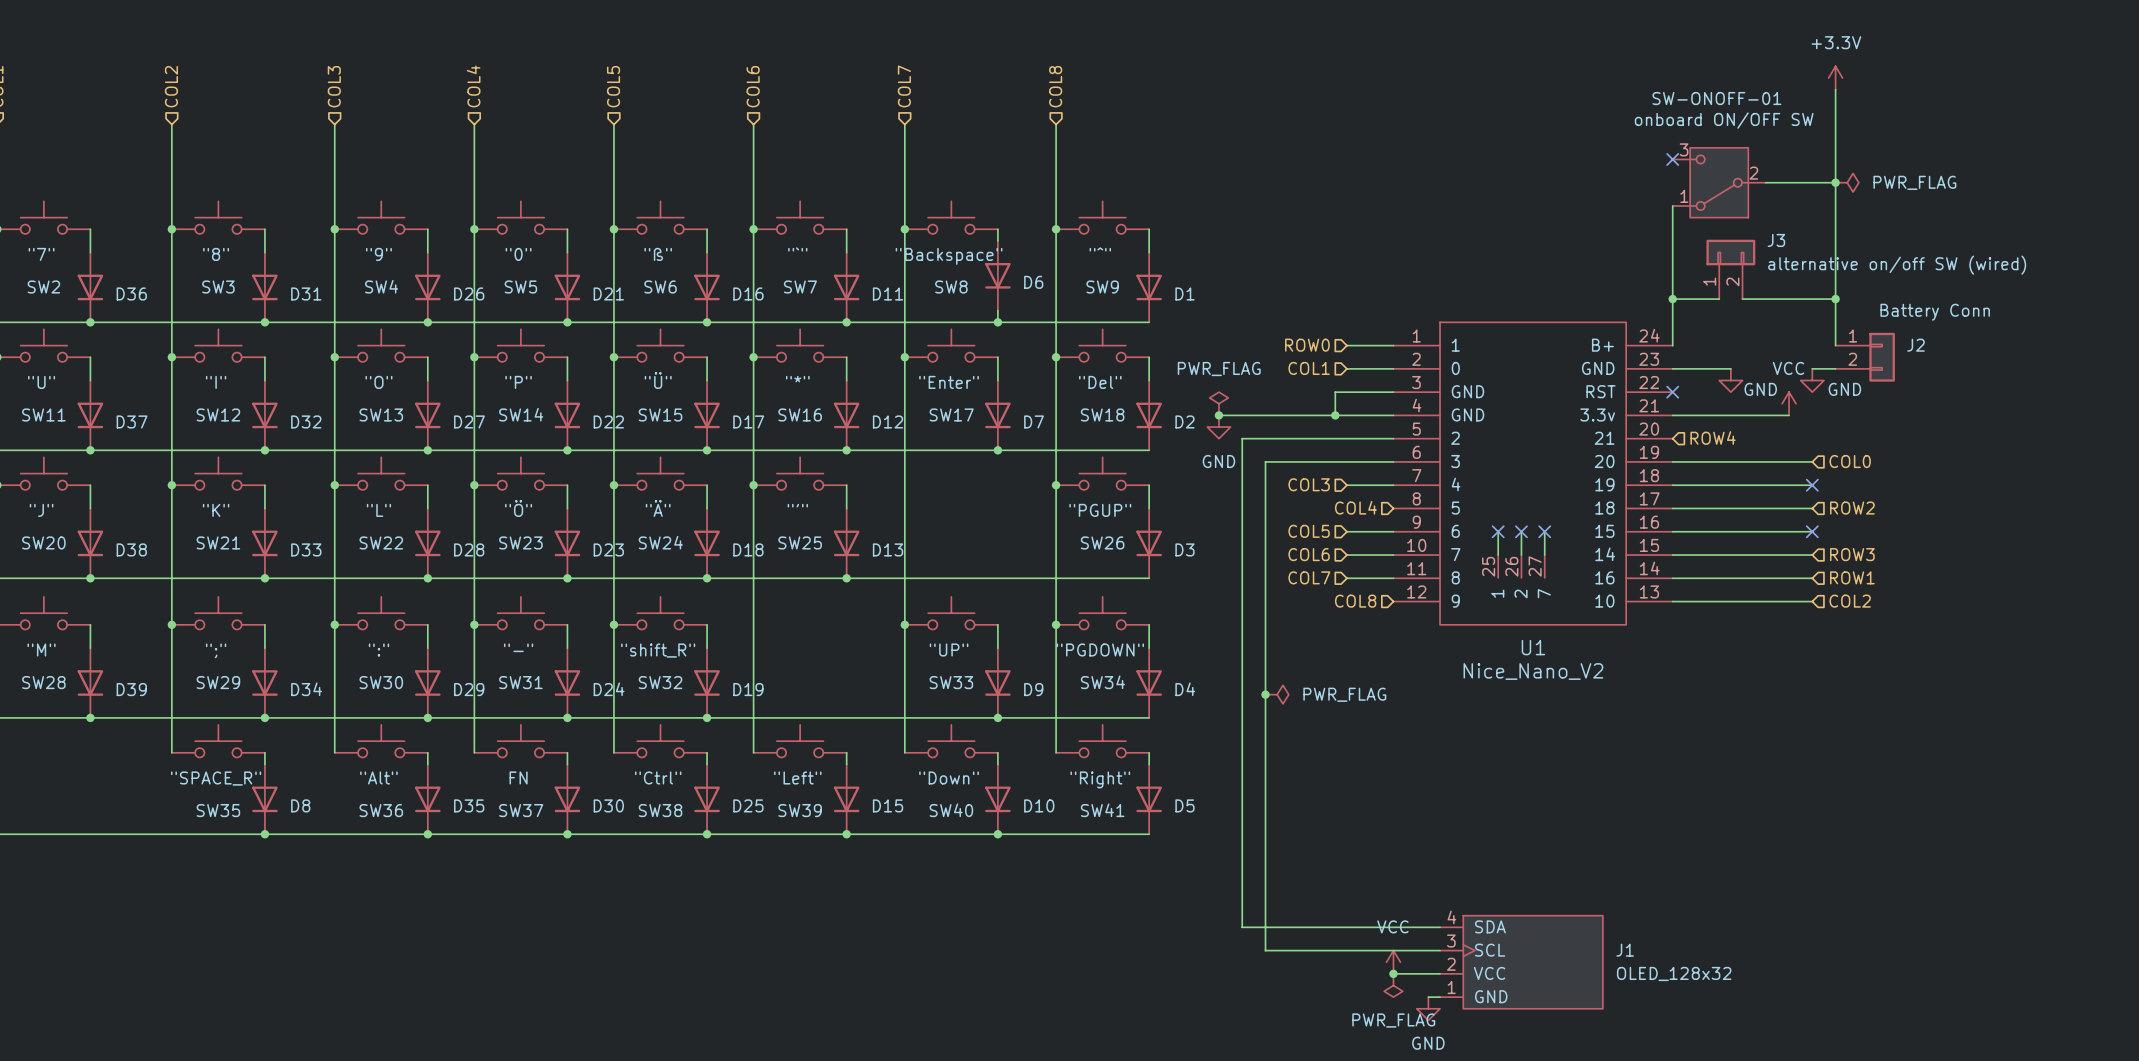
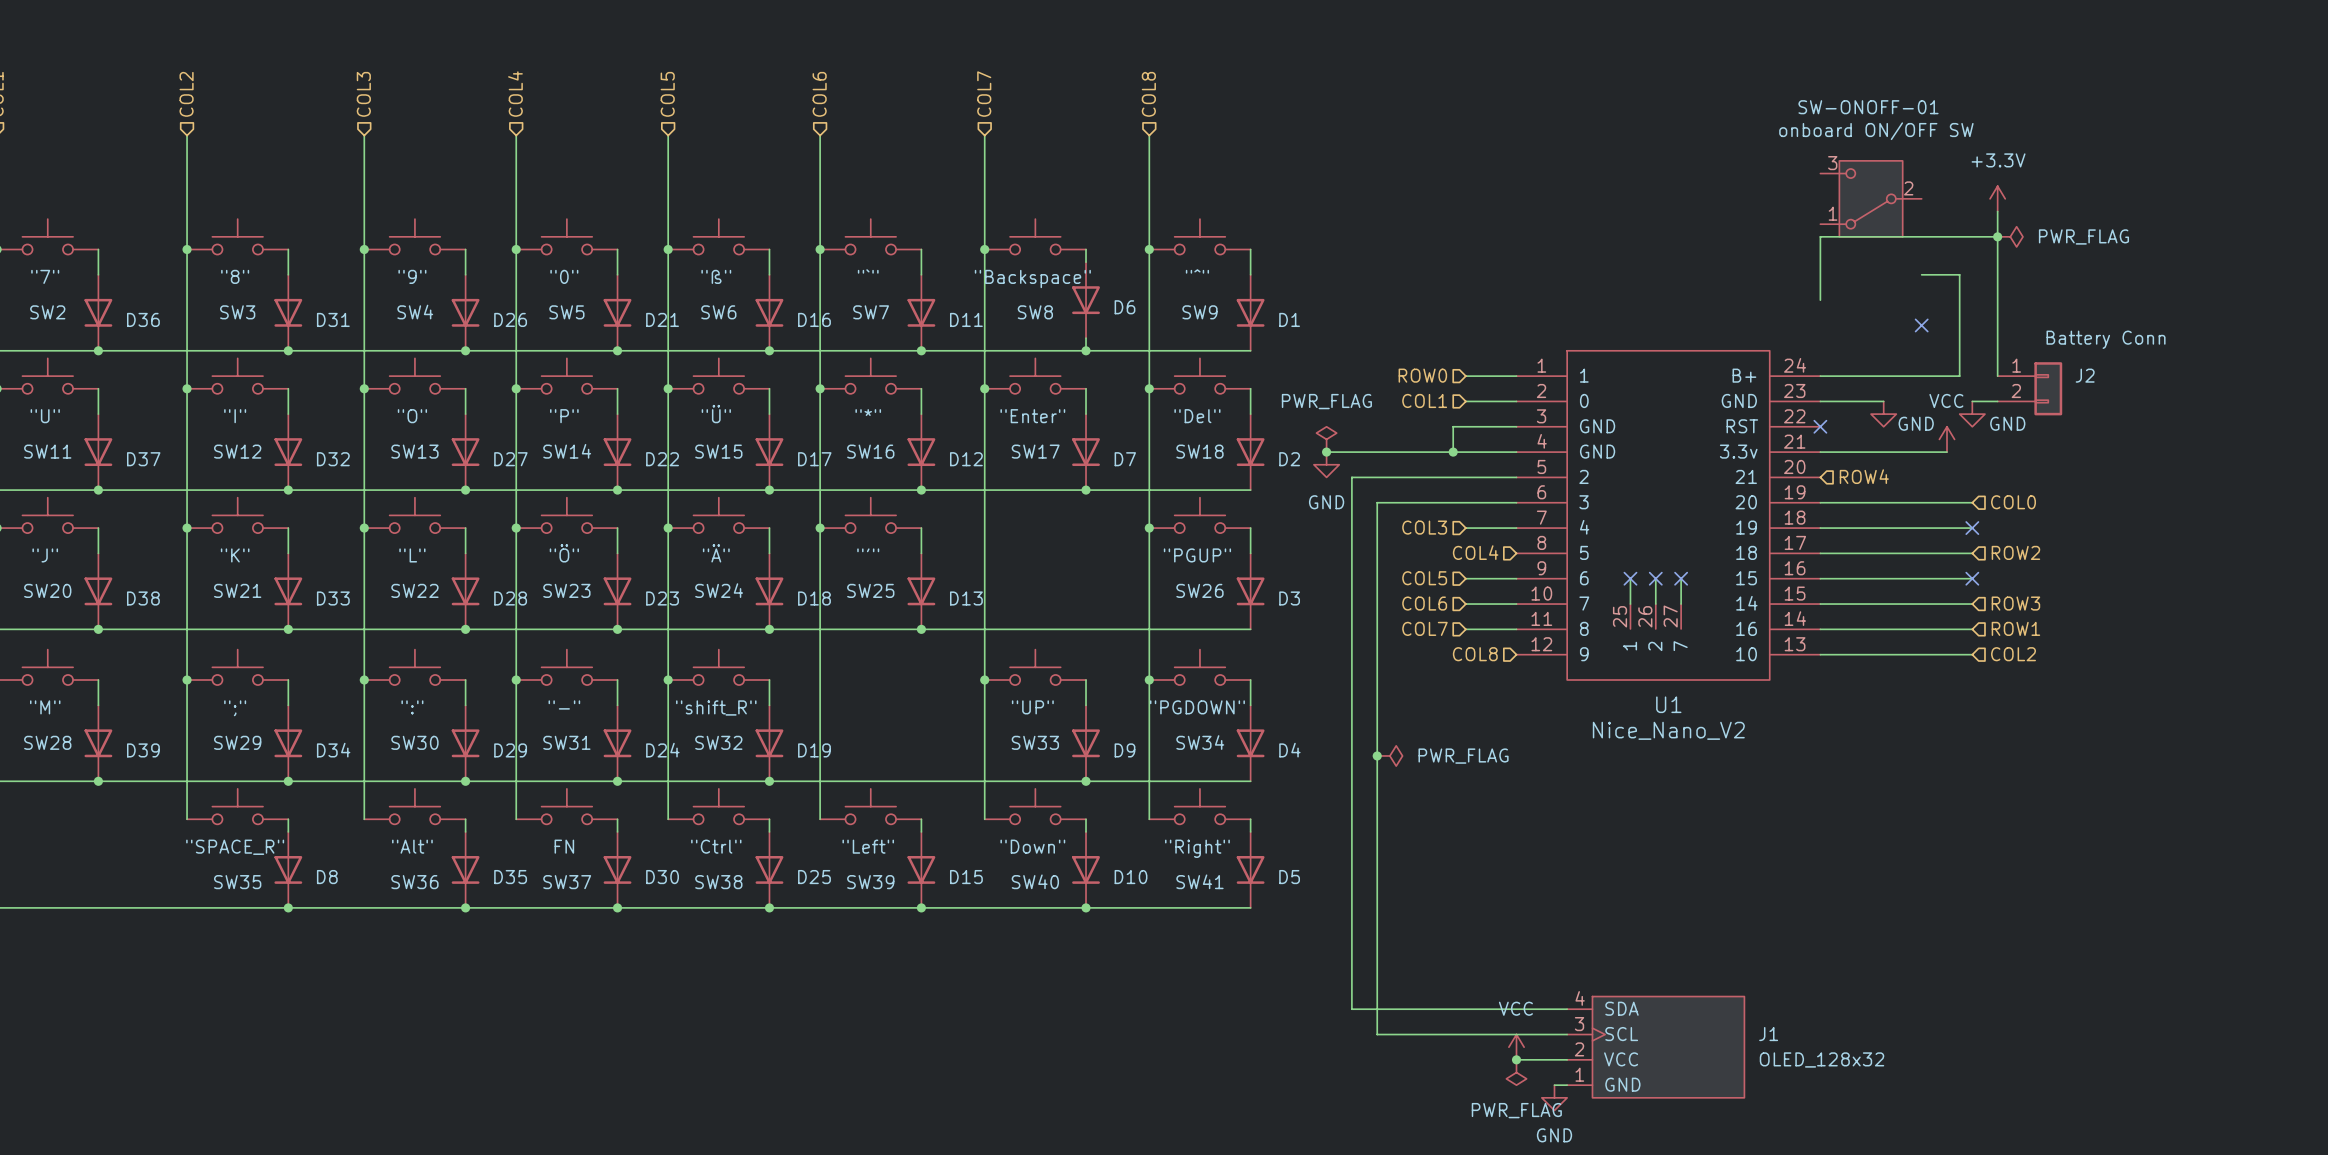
power symbol position: +3.3V (1835, 78) -> +3.3V (1997, 198)
wire: (1835, 89) (1835, 194) -> none
no-connect mark: (1672, 159) -> none
wire: (1765, 182) (1835, 182) -> none
junction position: (1835, 182) -> (1997, 236)
power symbol position: PWR_FLAG (1847, 182) -> PWR_FLAG (2010, 236)
wire: (1672, 205) (1672, 217) -> (1997, 236) (1820, 236)
J3: alternative on/off SW (wired) (1730, 269) -> none
wire: (1672, 275) (1672, 345) -> (1921, 274) (1959, 274) (1959, 376) (1820, 376)
wire: (1672, 299) (1719, 299) -> none
junction: (1672, 299) -> none
wire: (1742, 299) (1835, 299) -> none
no-connect mark: none -> (1921, 325)
junction: (1835, 299) -> none

